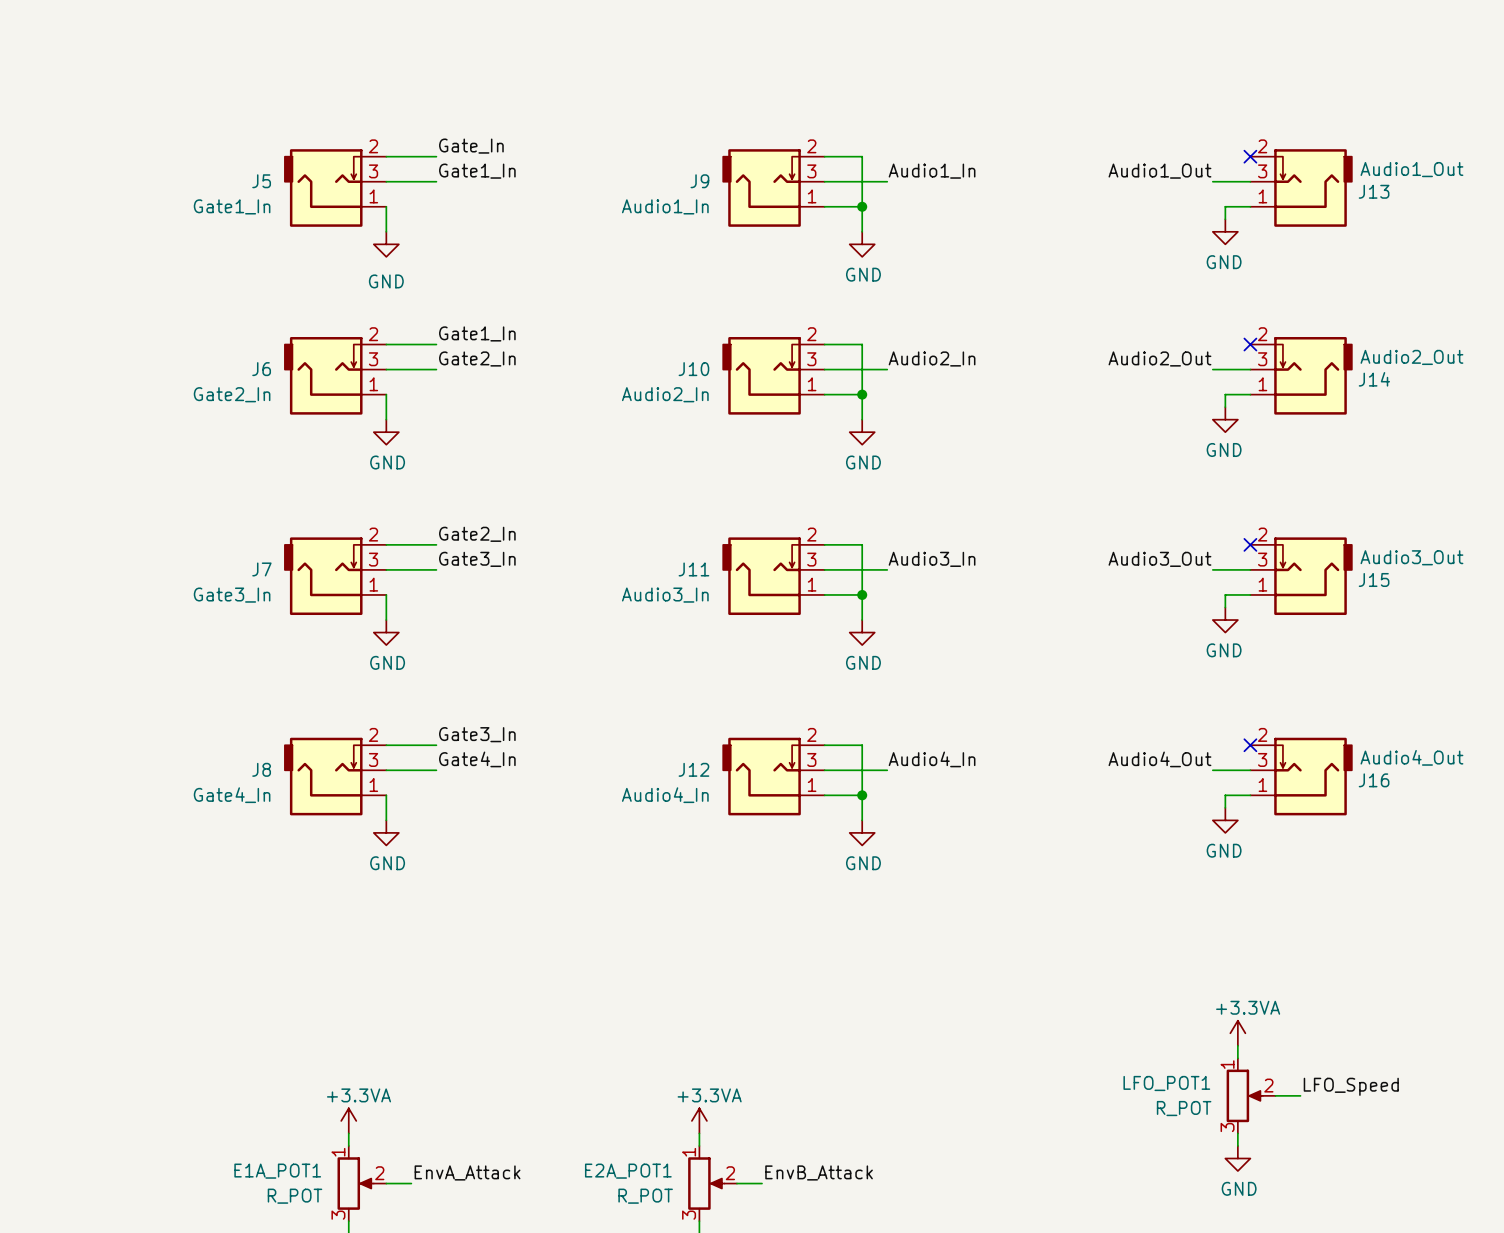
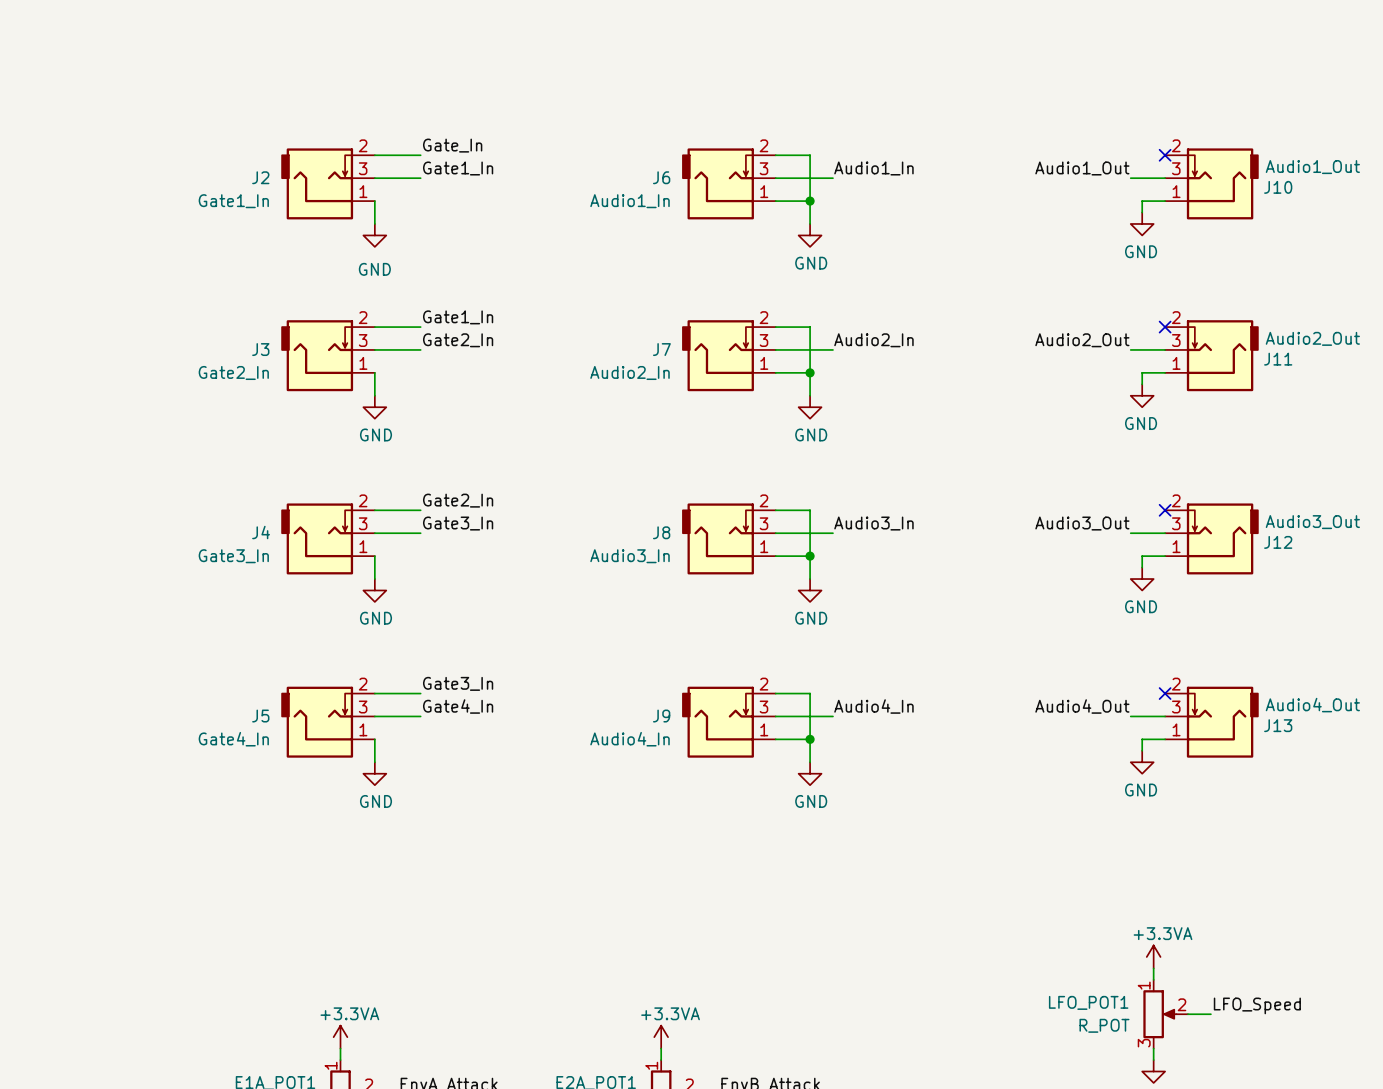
J5 name: J5 (261, 181) -> J2 (260, 177)
J9 name: J9 (699, 181) -> J6 (661, 177)
J13 name: J13 (1374, 191) -> J10 (1278, 187)
J6 name: J6 (261, 369) -> J3 (260, 349)
J10 name: J10 (693, 369) -> J7 (661, 349)
J14 name: J14 (1374, 379) -> J11 (1278, 359)
J7 name: J7 (261, 569) -> J4 (261, 532)
J11 name: J11 (693, 569) -> J8 (661, 532)
J15 name: J15 (1374, 579) -> J12 (1278, 542)
J8 name: J8 (261, 769) -> J5 (260, 716)
J12 name: J12 (693, 769) -> J9 (661, 716)
J16 name: J16 (1374, 780) -> J13 (1278, 725)

